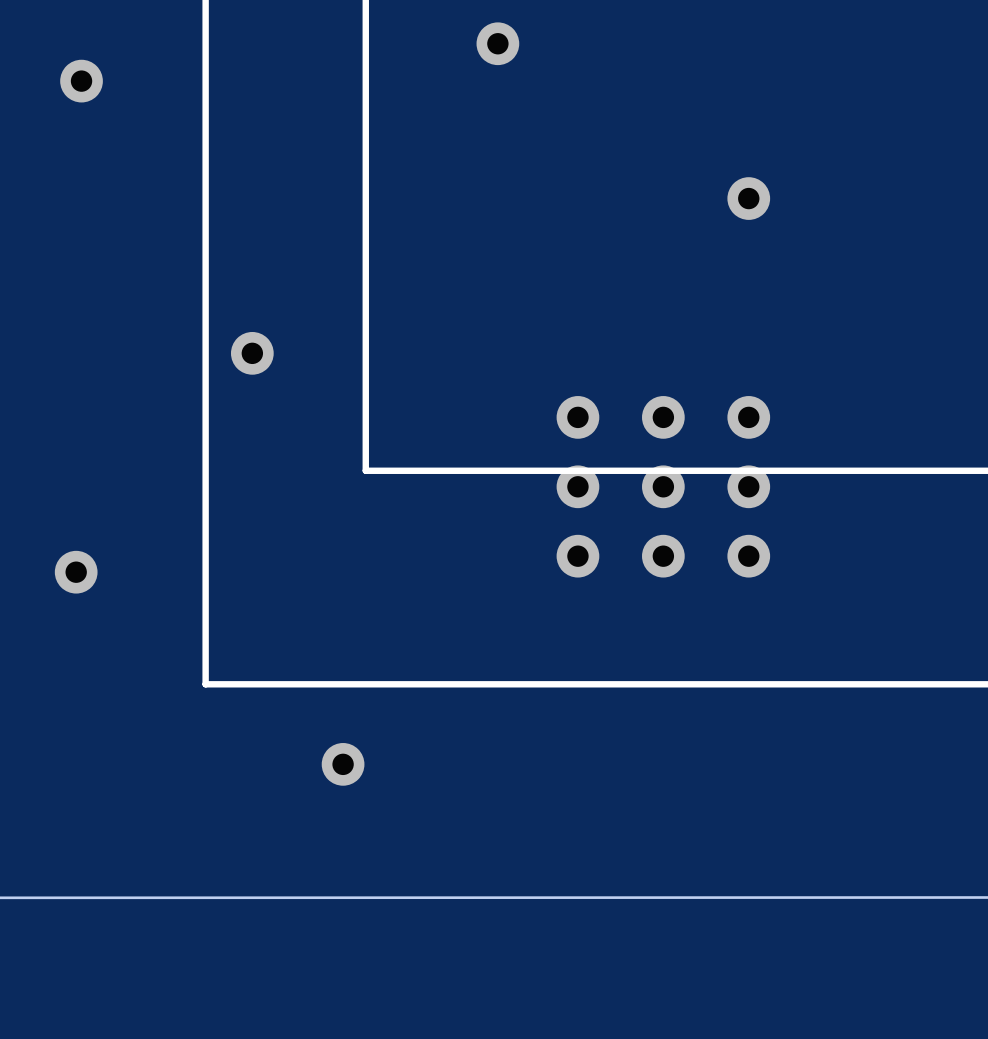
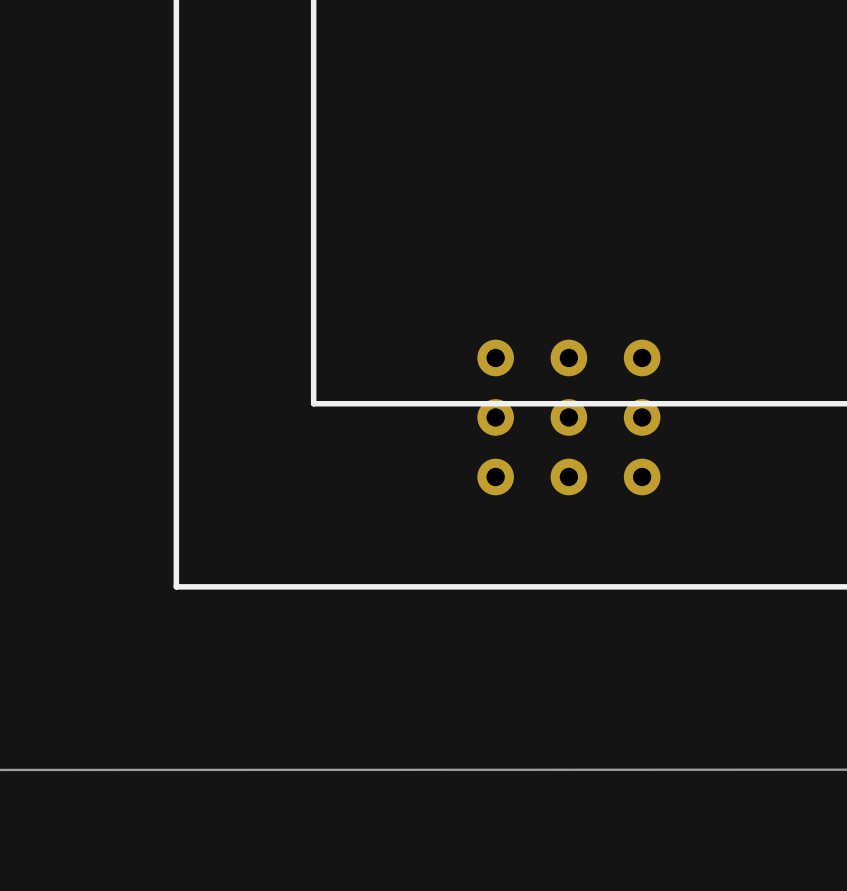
via: (497, 43) -> none
via: (81, 81) -> none
via: (748, 198) -> none
via: (252, 353) -> none
via: (76, 572) -> none
via: (343, 764) -> none

